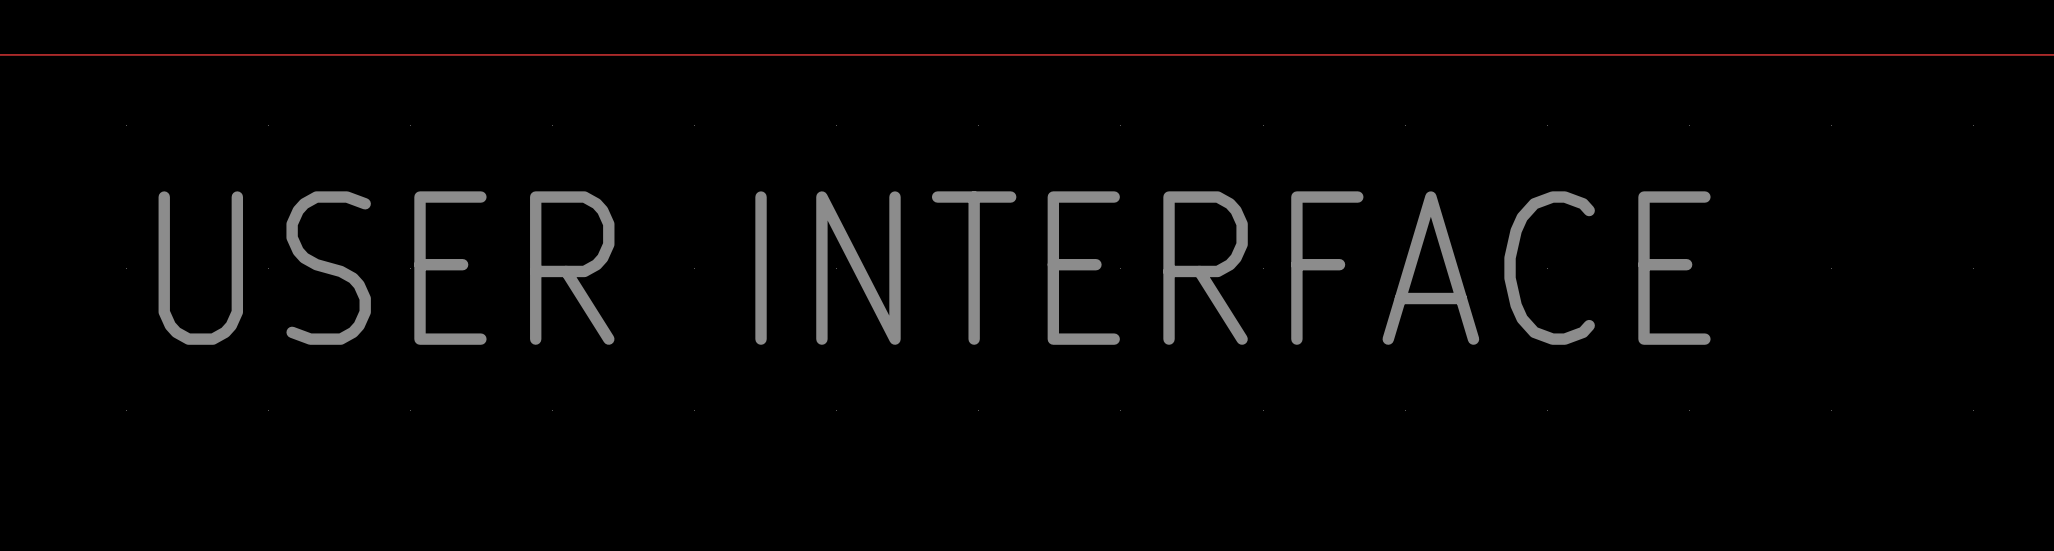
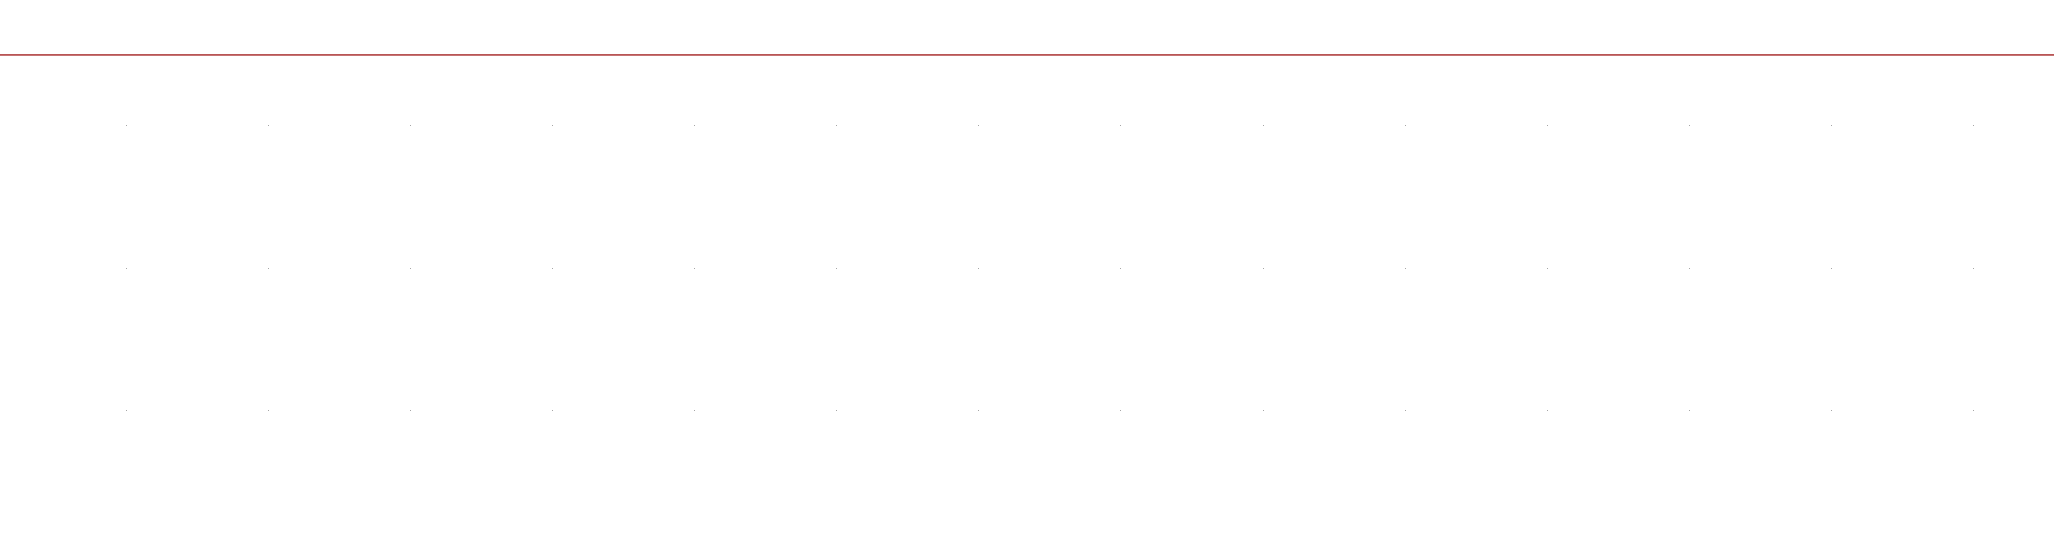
text: USER INTERFACE (934, 268) -> none

